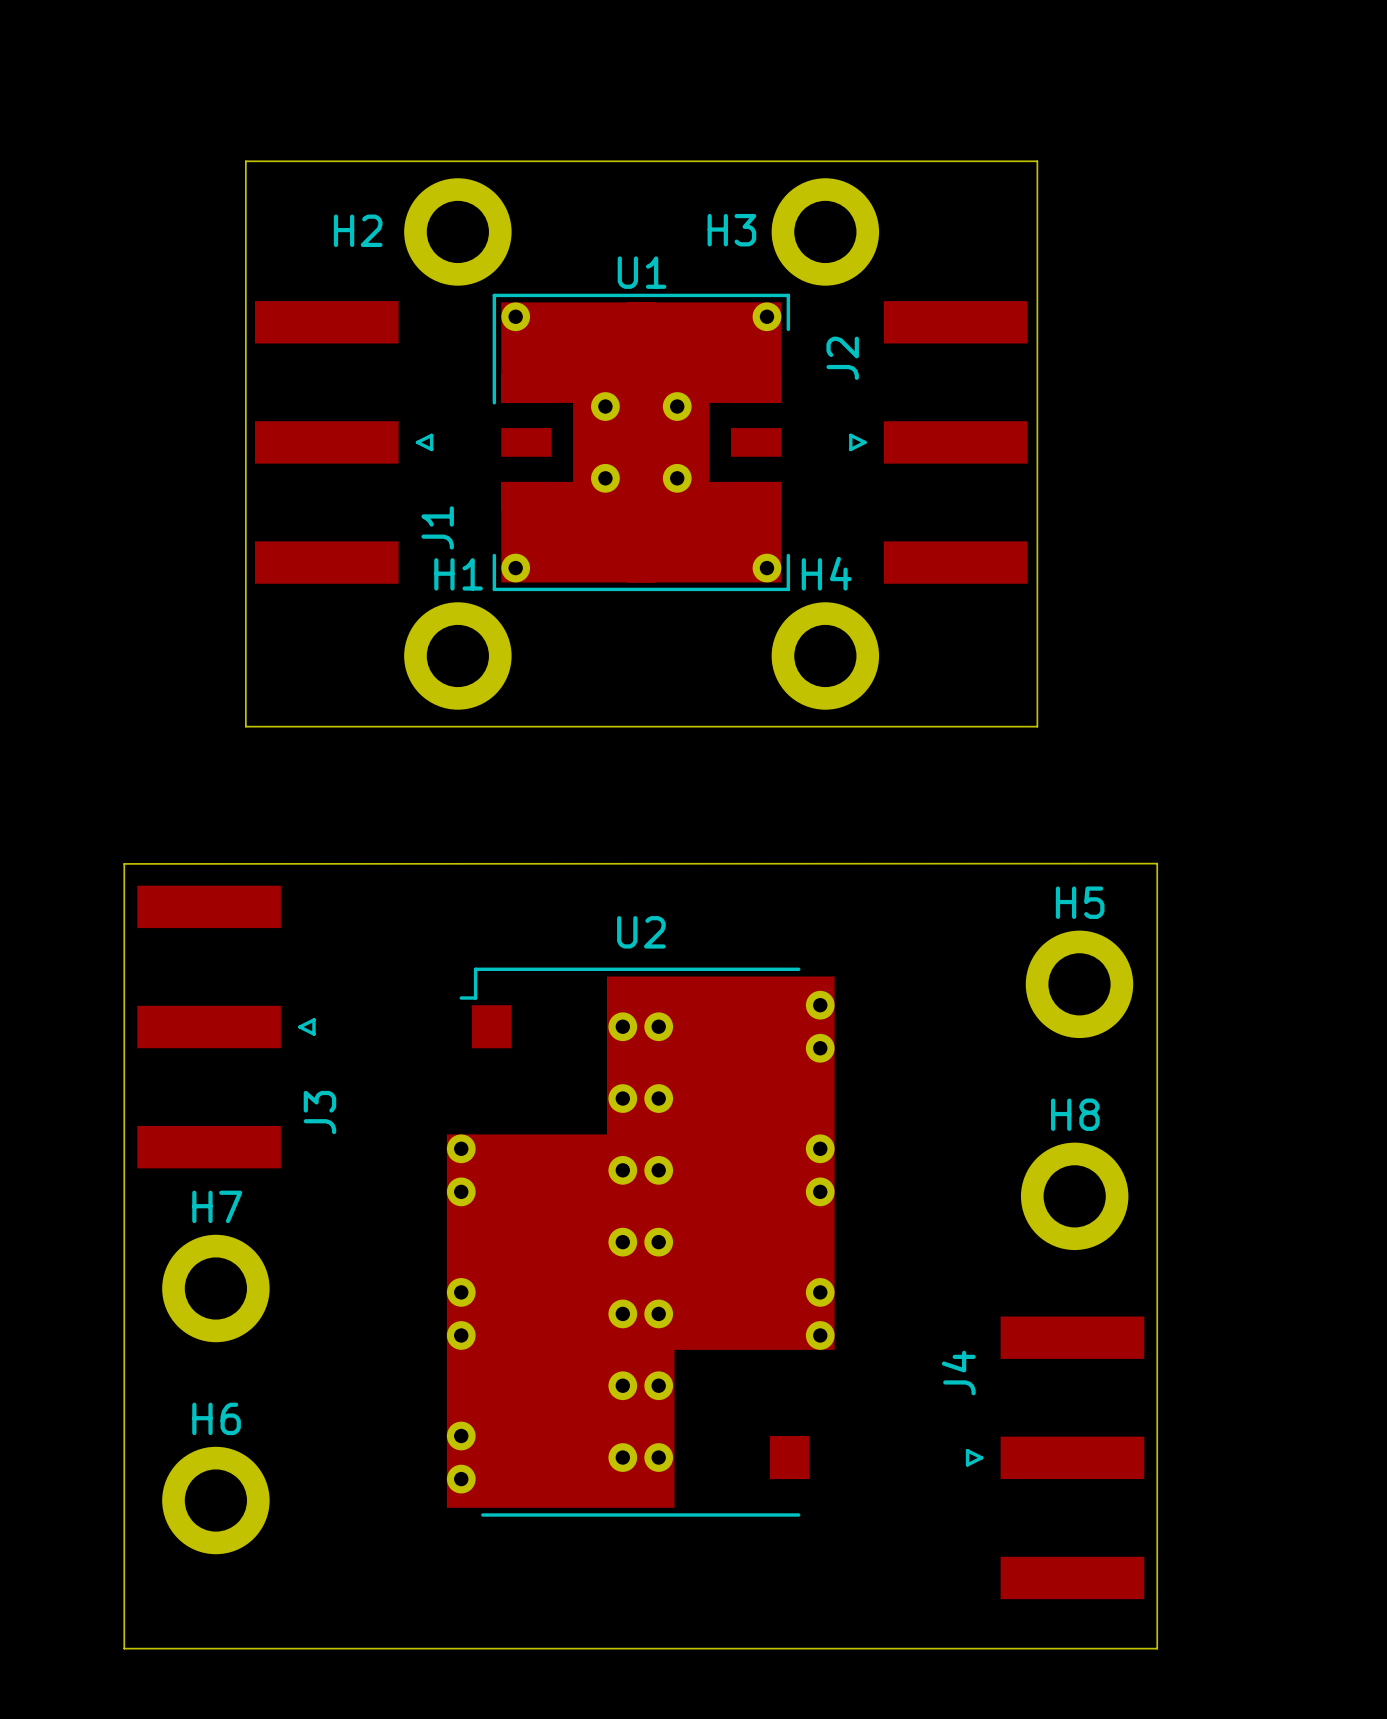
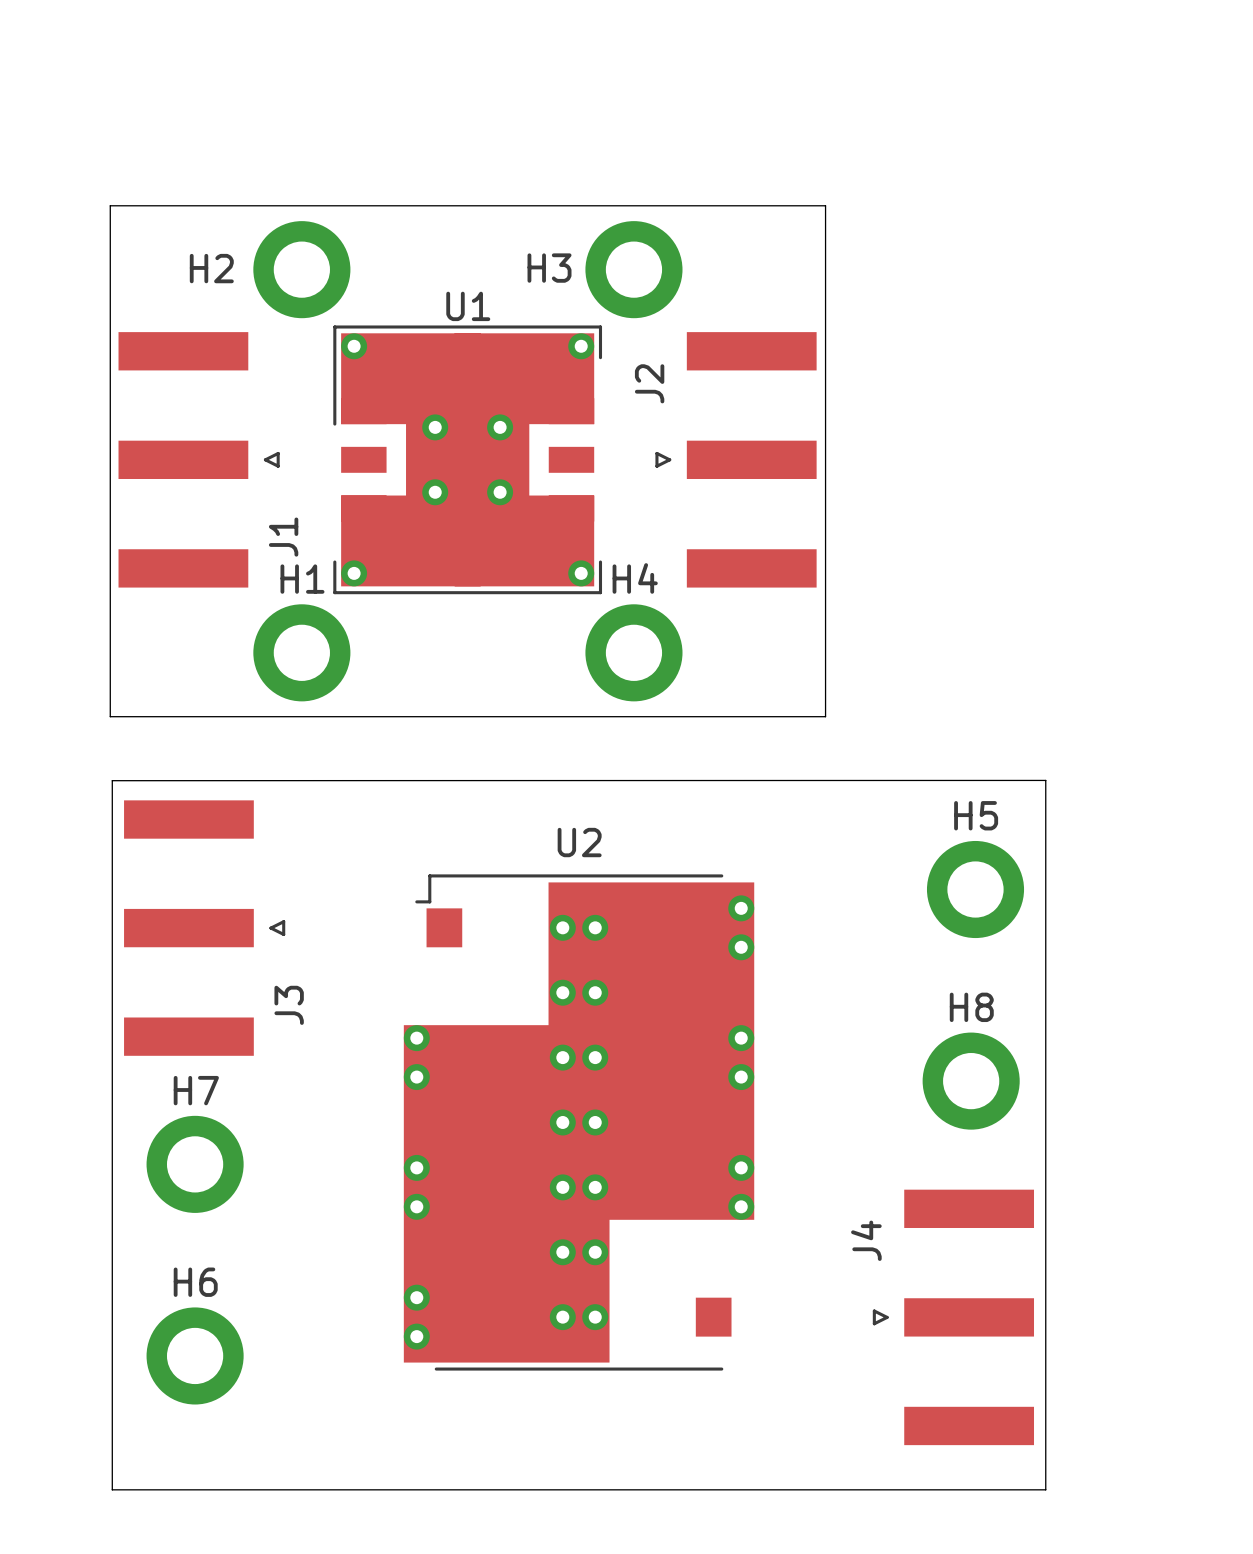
board edge: (245, 161) (1037, 161) (1037, 726) (245, 726) (245, 161) -> (110, 205) (110, 716) (825, 716) (825, 205) (110, 205)
H2 position: (457, 231) -> (301, 269)
H3 position: (825, 231) -> (633, 269)
J1 position: (344, 442) -> (199, 459)
U1 position: (641, 442) -> (467, 459)
J2 position: (938, 442) -> (736, 459)
H1 position: (457, 655) -> (301, 652)
H4 position: (825, 655) -> (633, 652)

